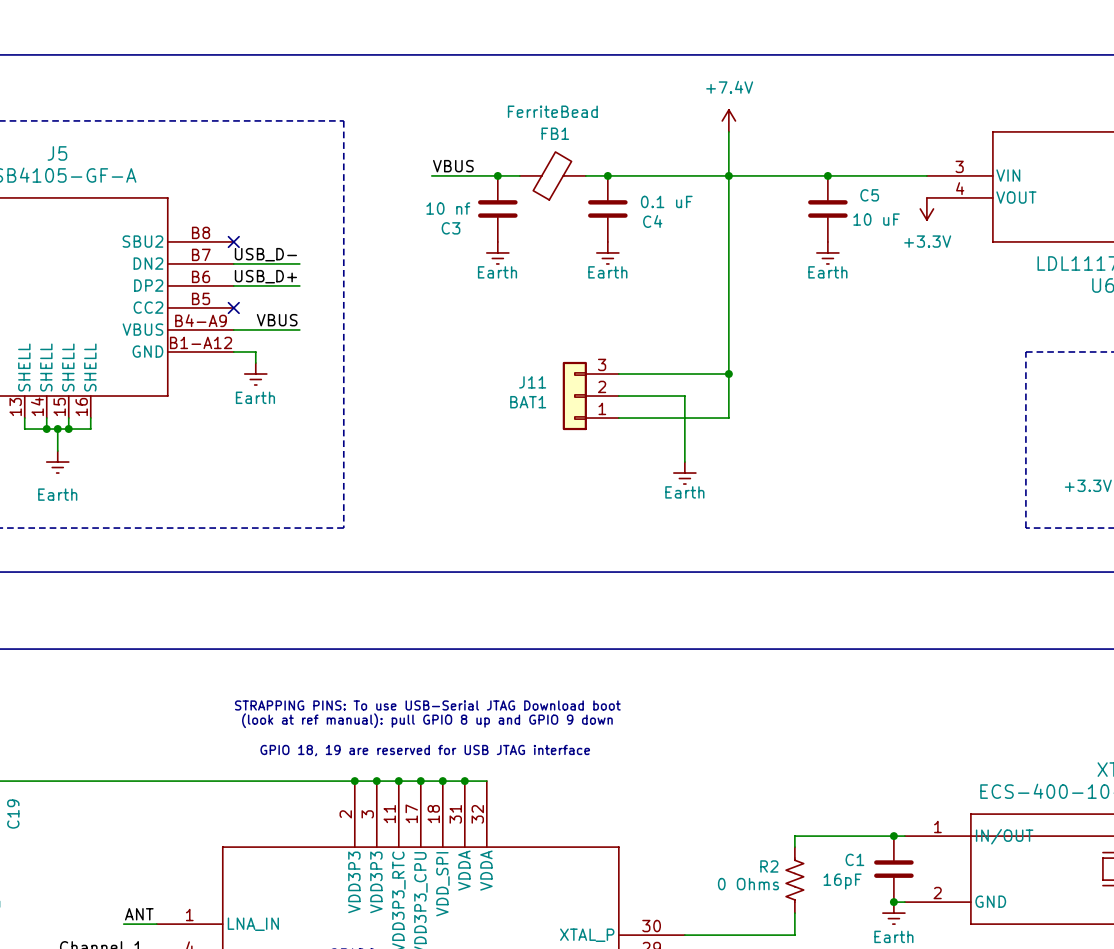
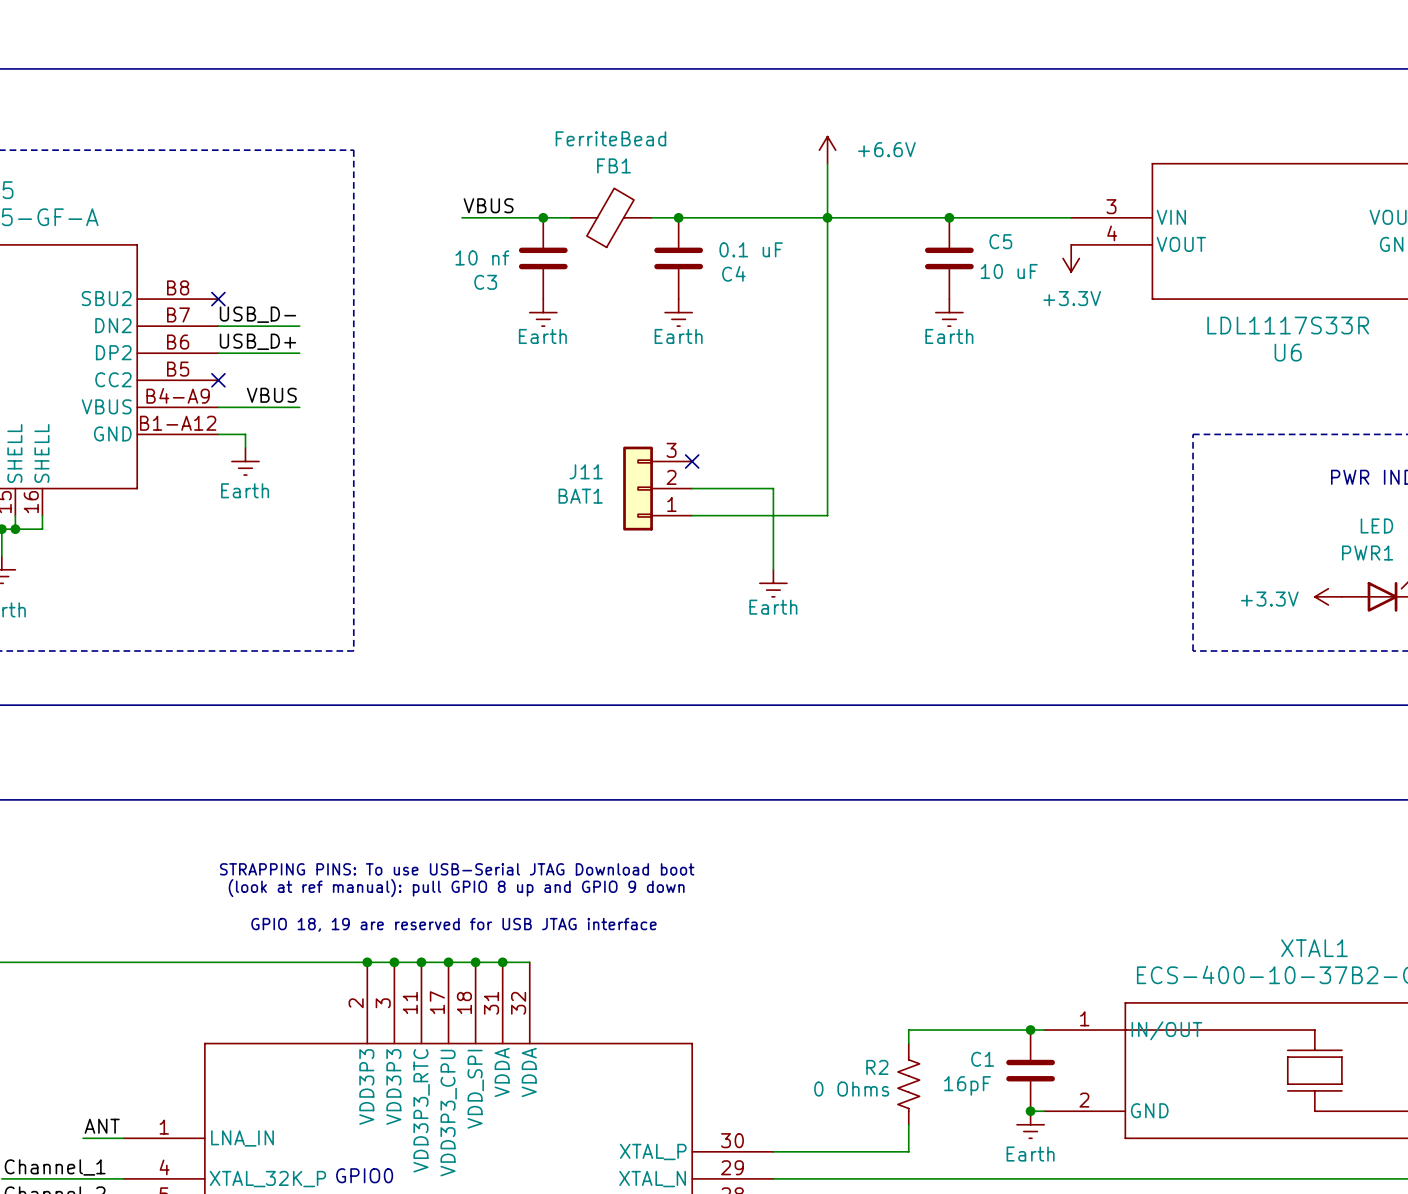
power symbol: +7.4V (728, 120) -> +6.6V (827, 150)
wire: (618, 374) (728, 374) -> none
no-connect mark: none -> (692, 461)
junction: (728, 374) -> none

